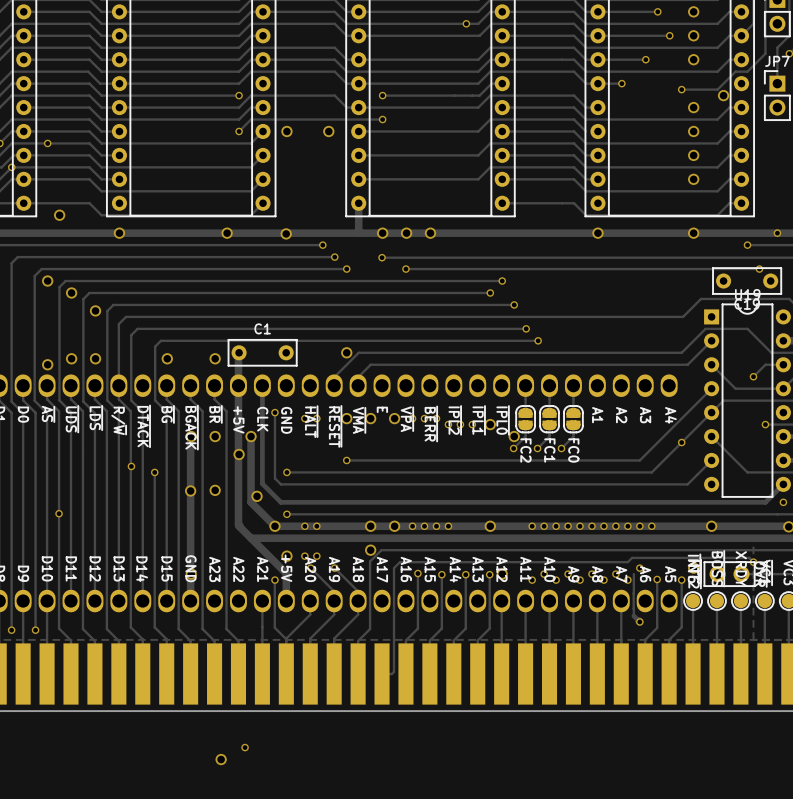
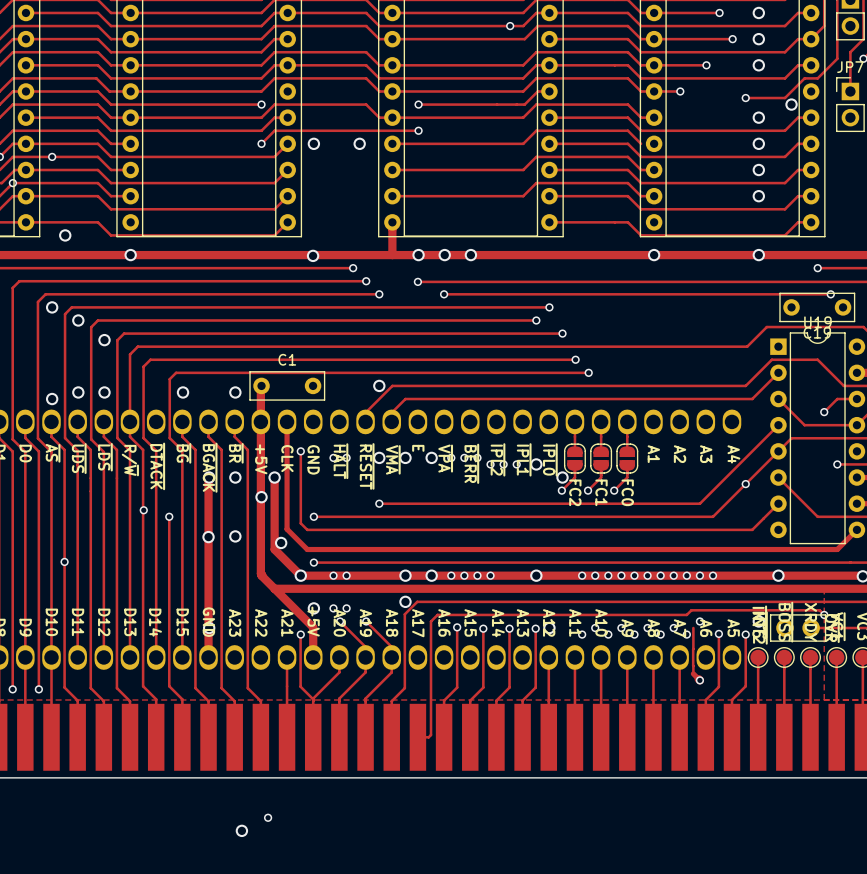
via: (227, 233) -> none
via: (777, 233) -> none
via: (783, 502) -> none

